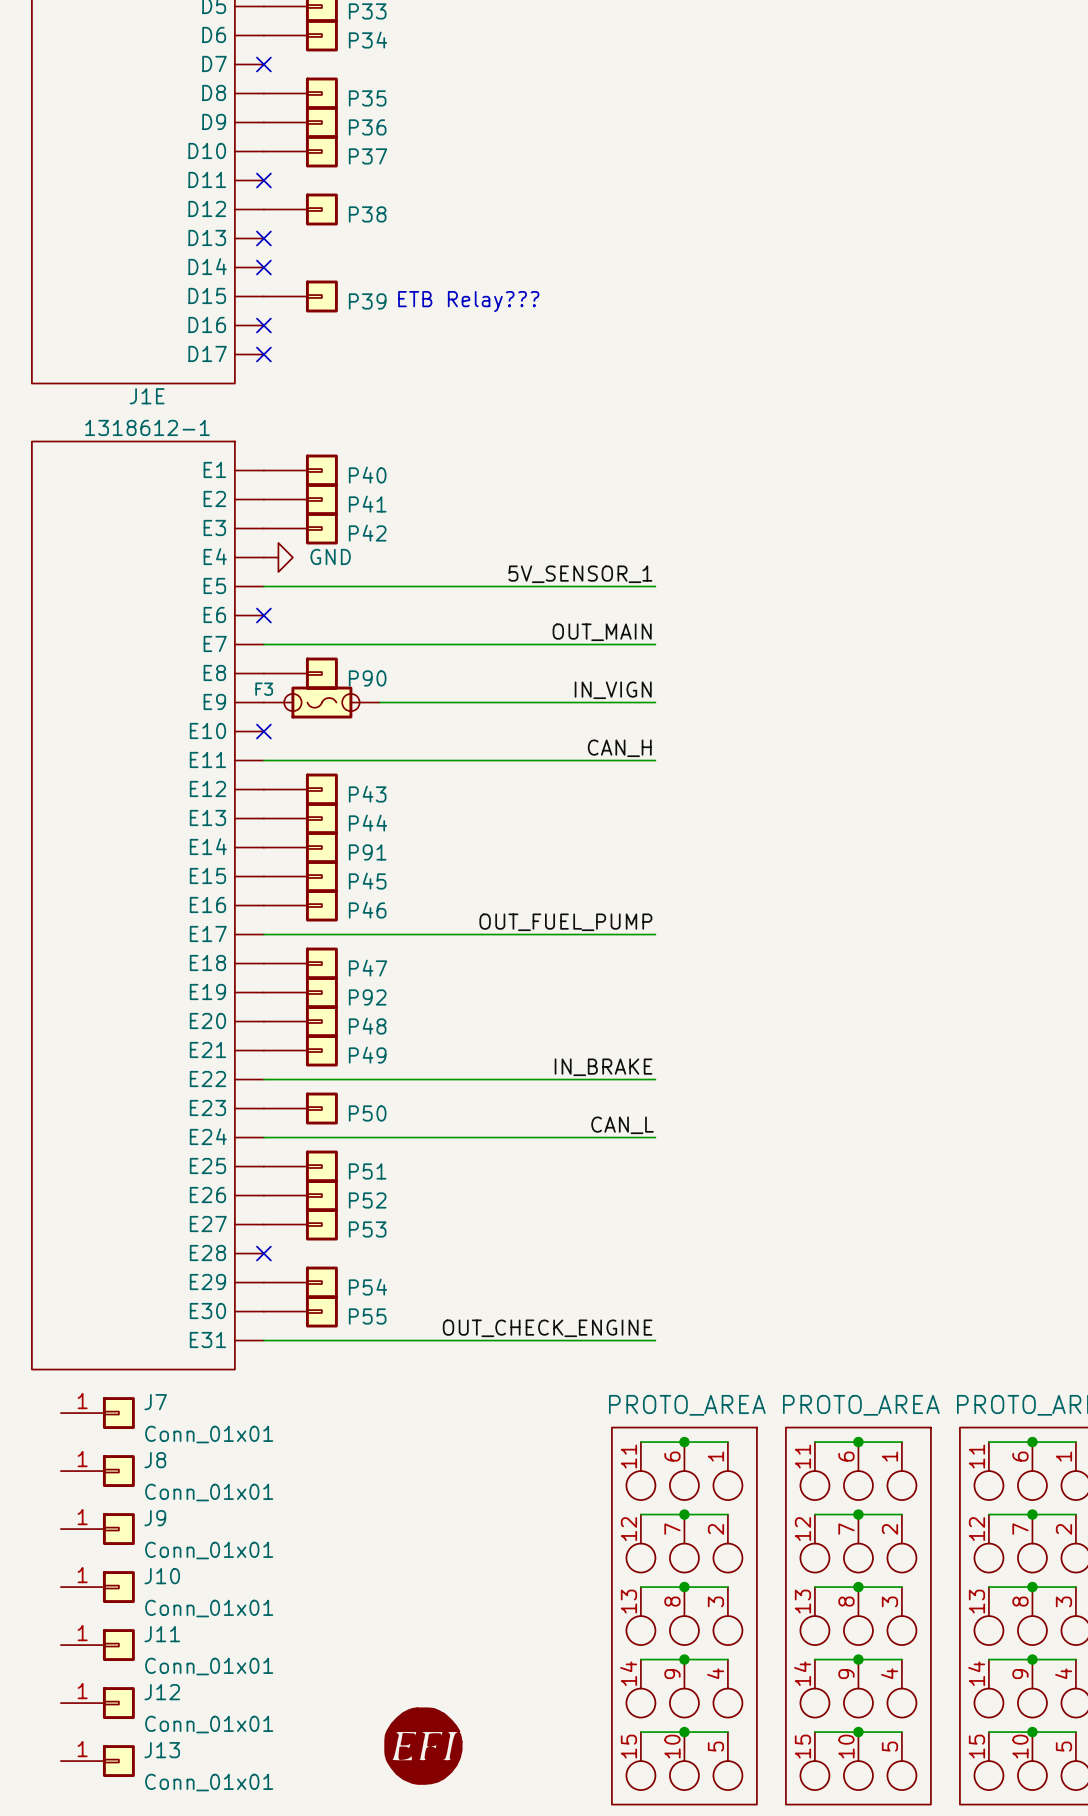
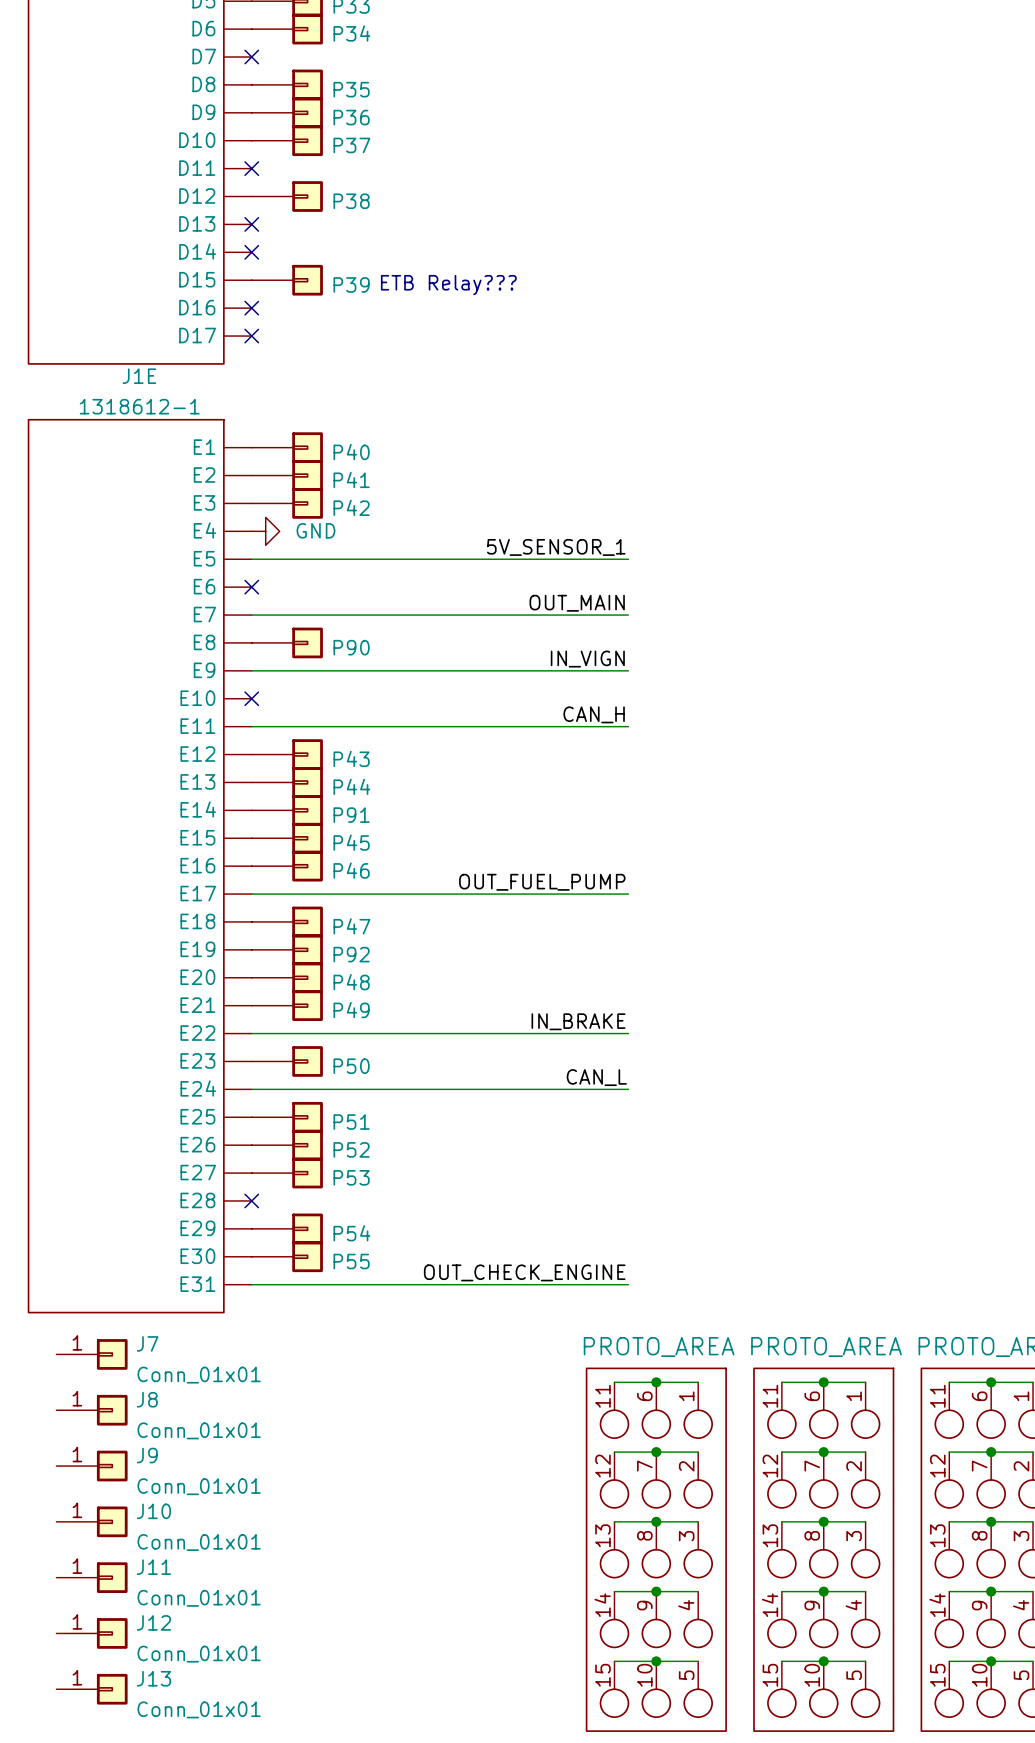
F3: (321, 702) -> none
part: (423, 1746) -> none

